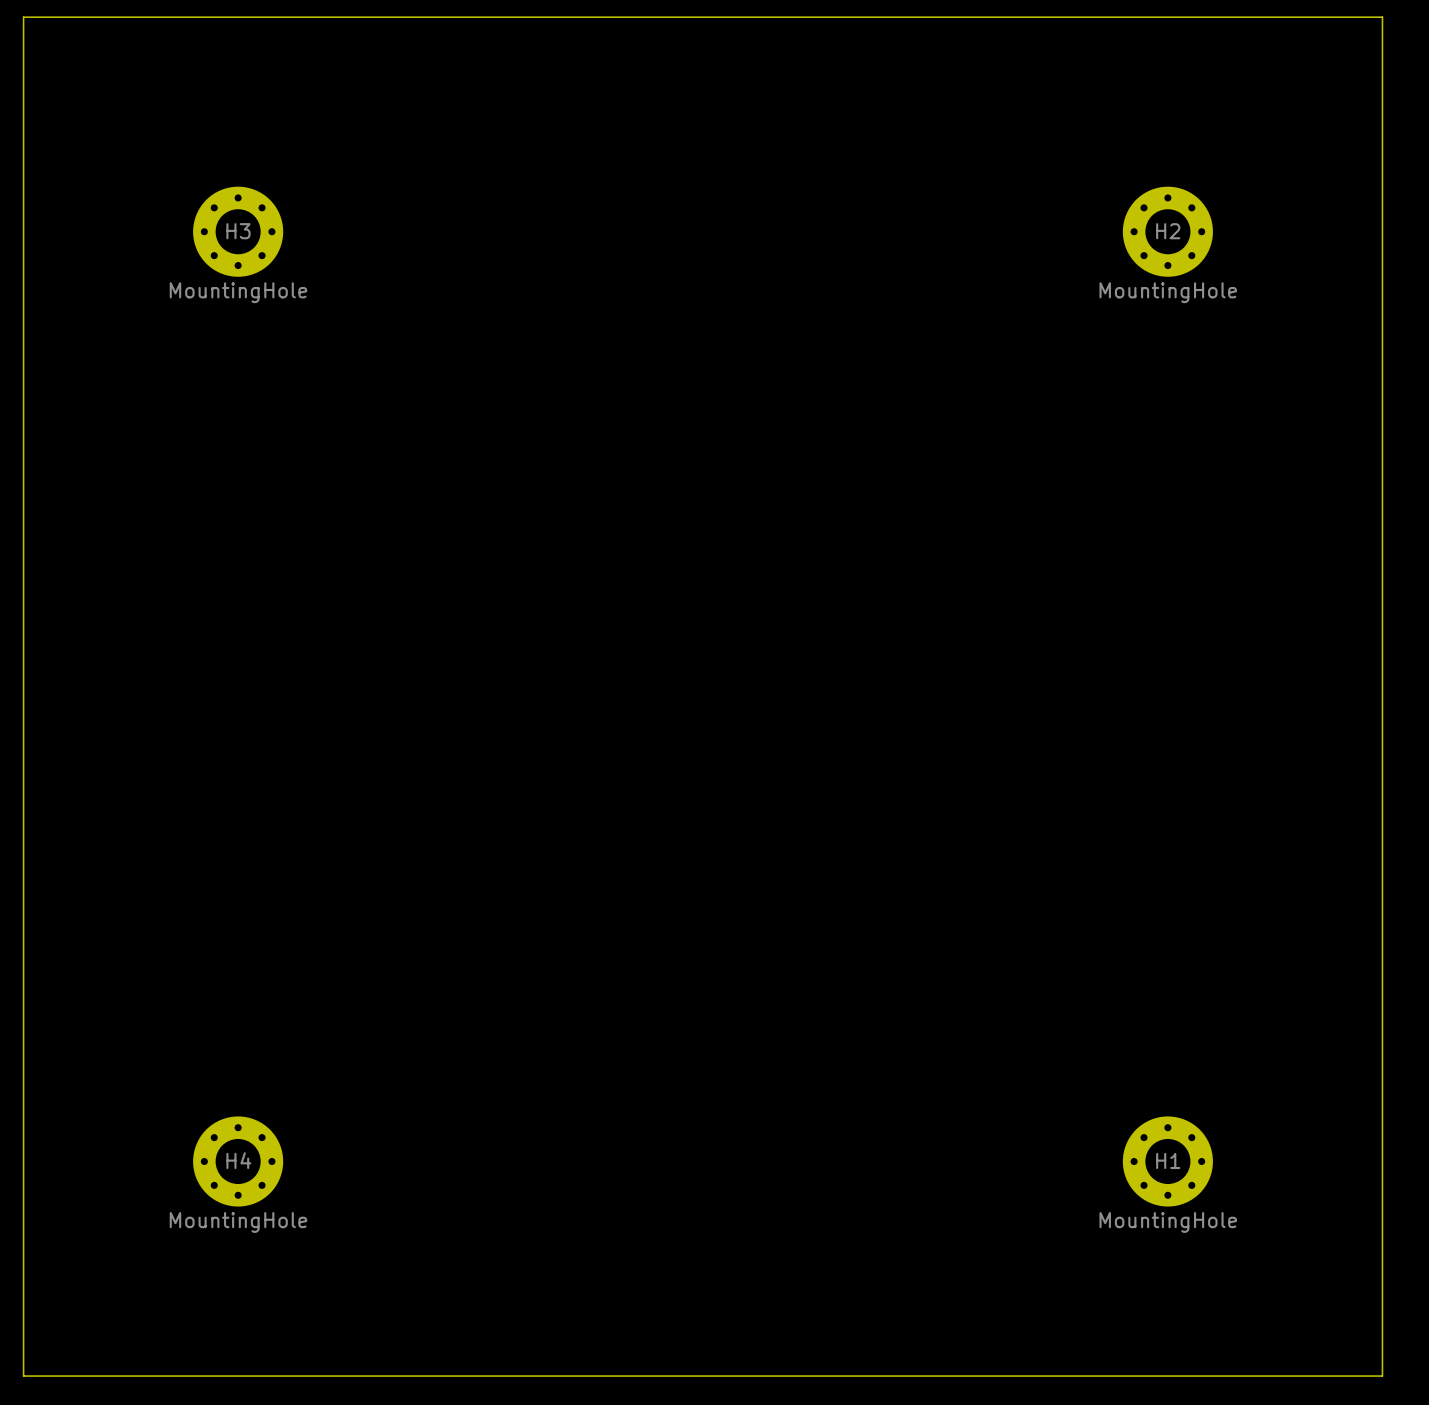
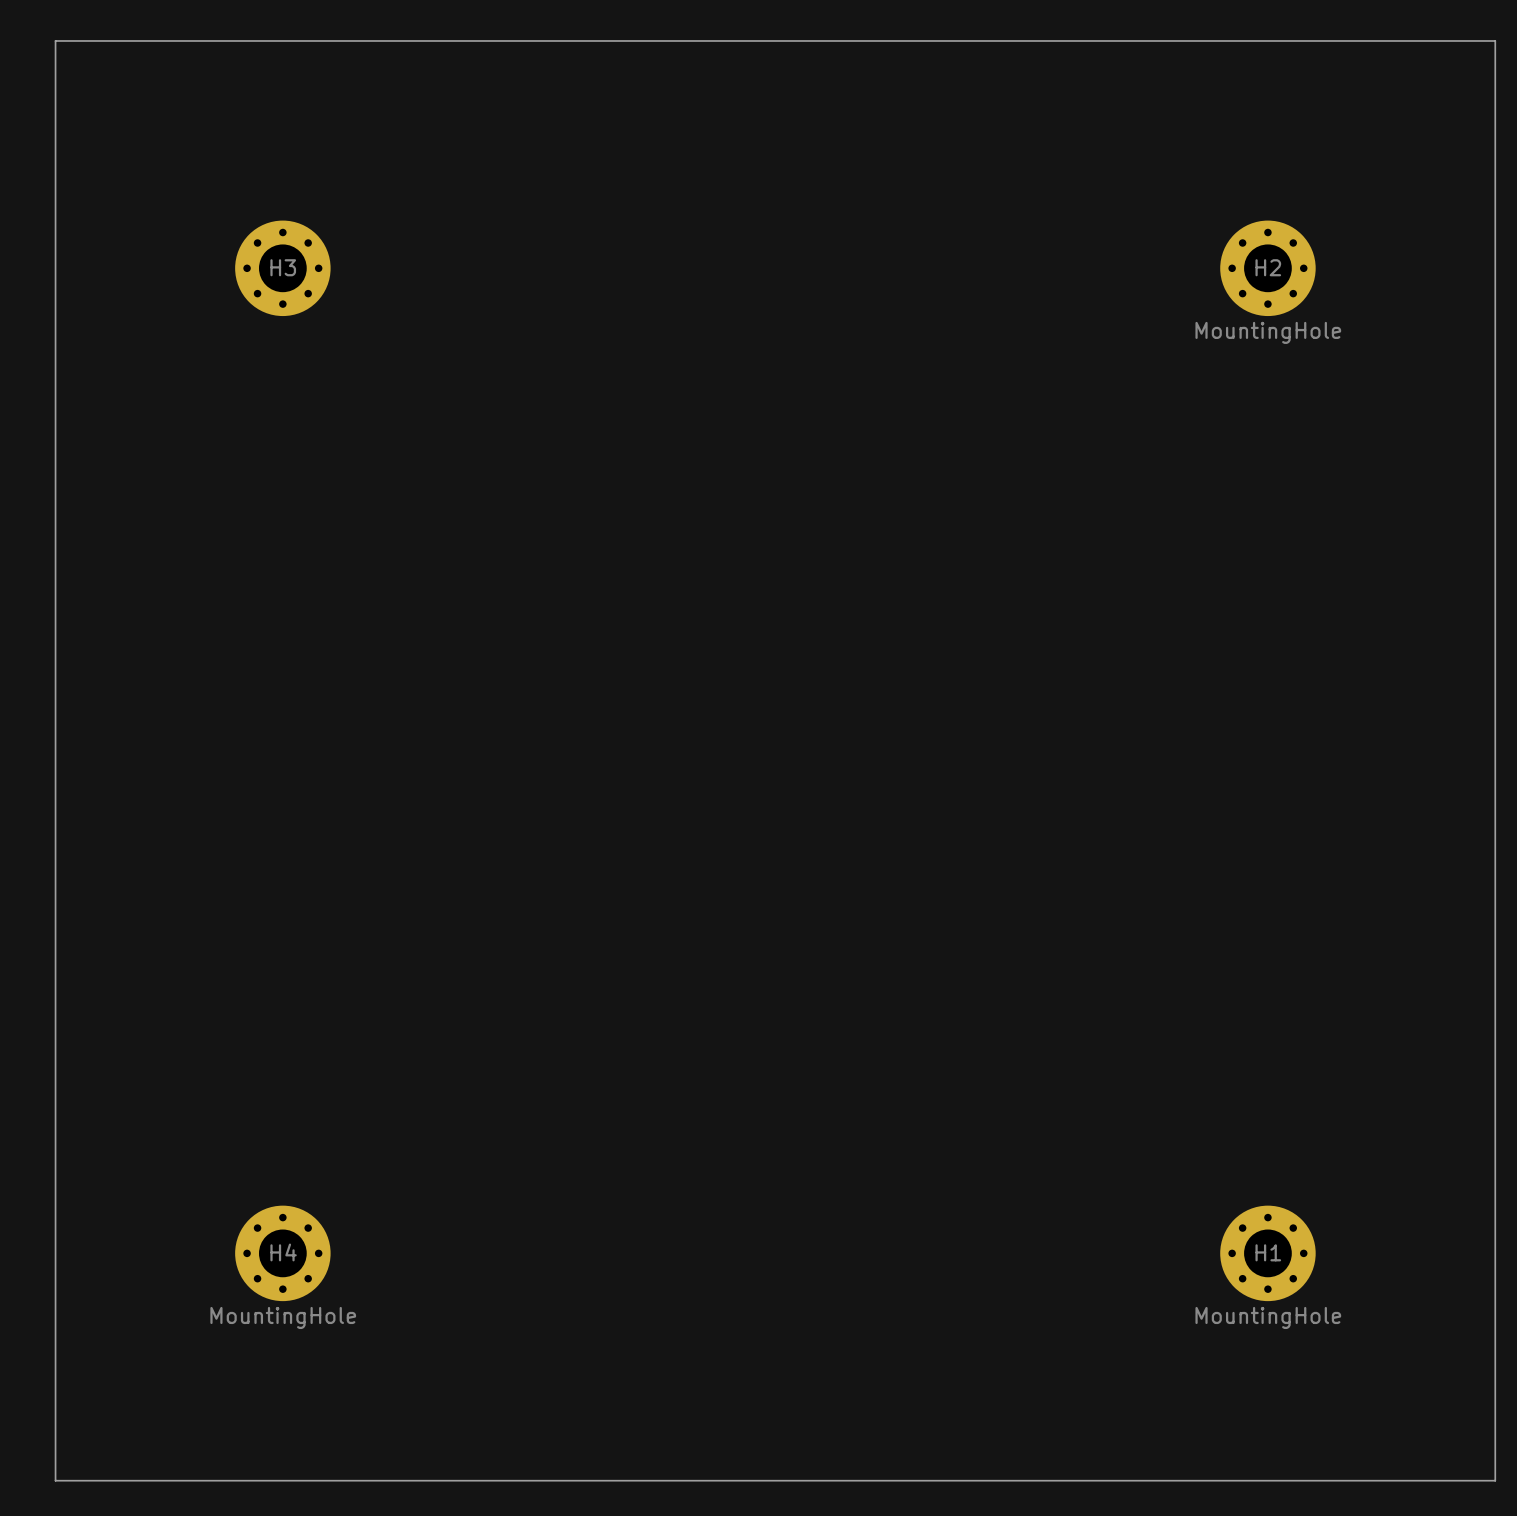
H3 value: MountingHole (238, 292) -> none

